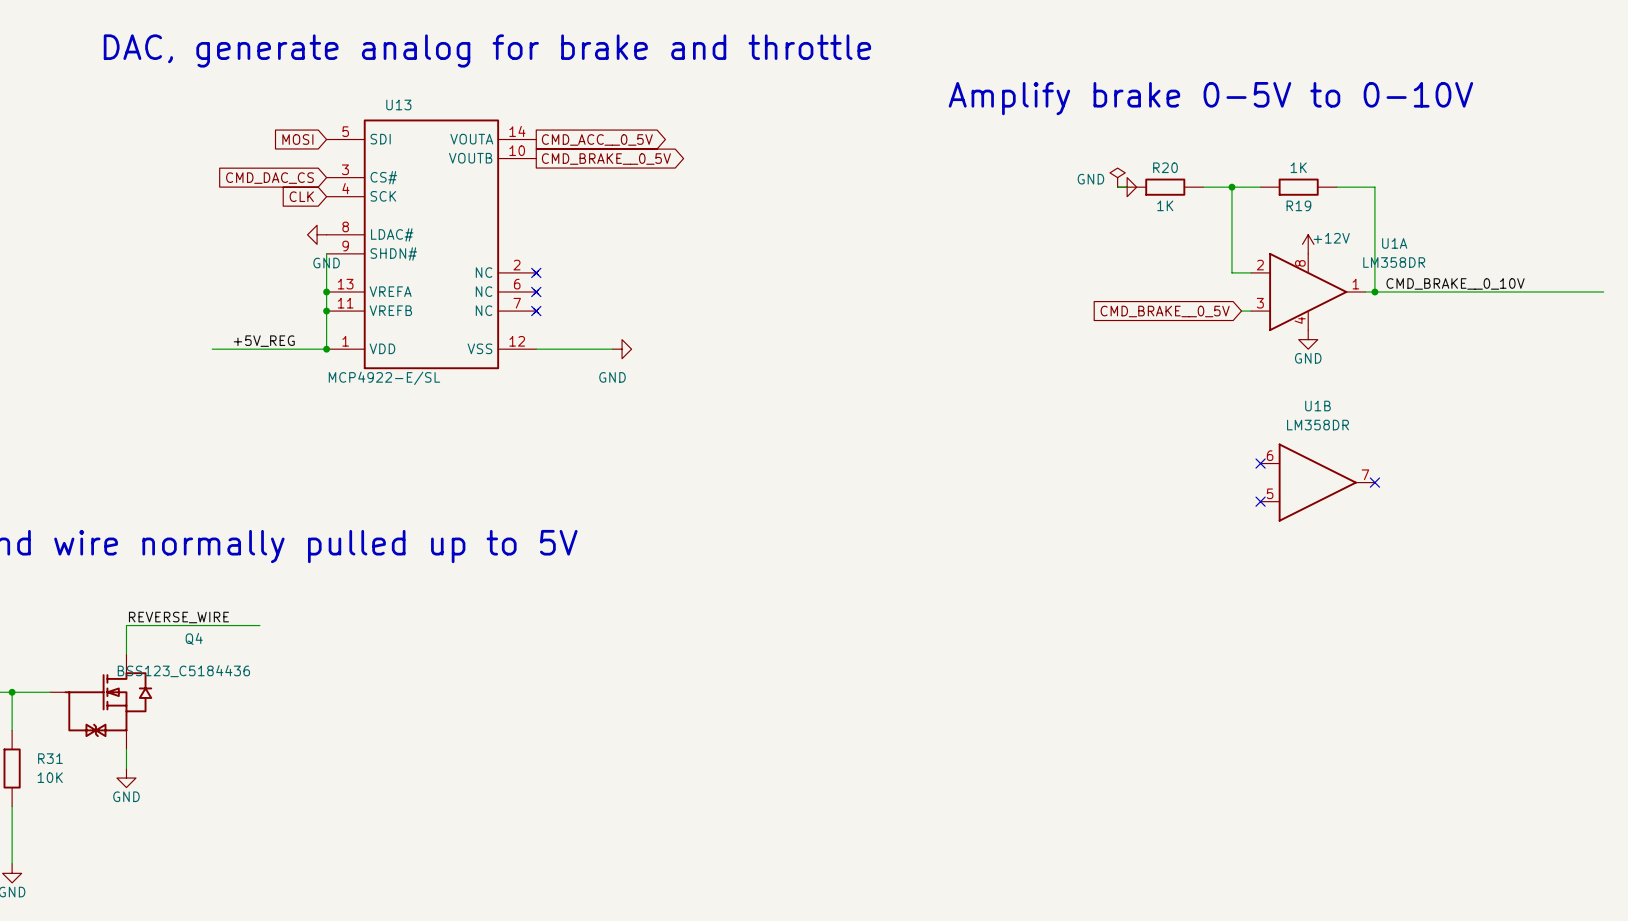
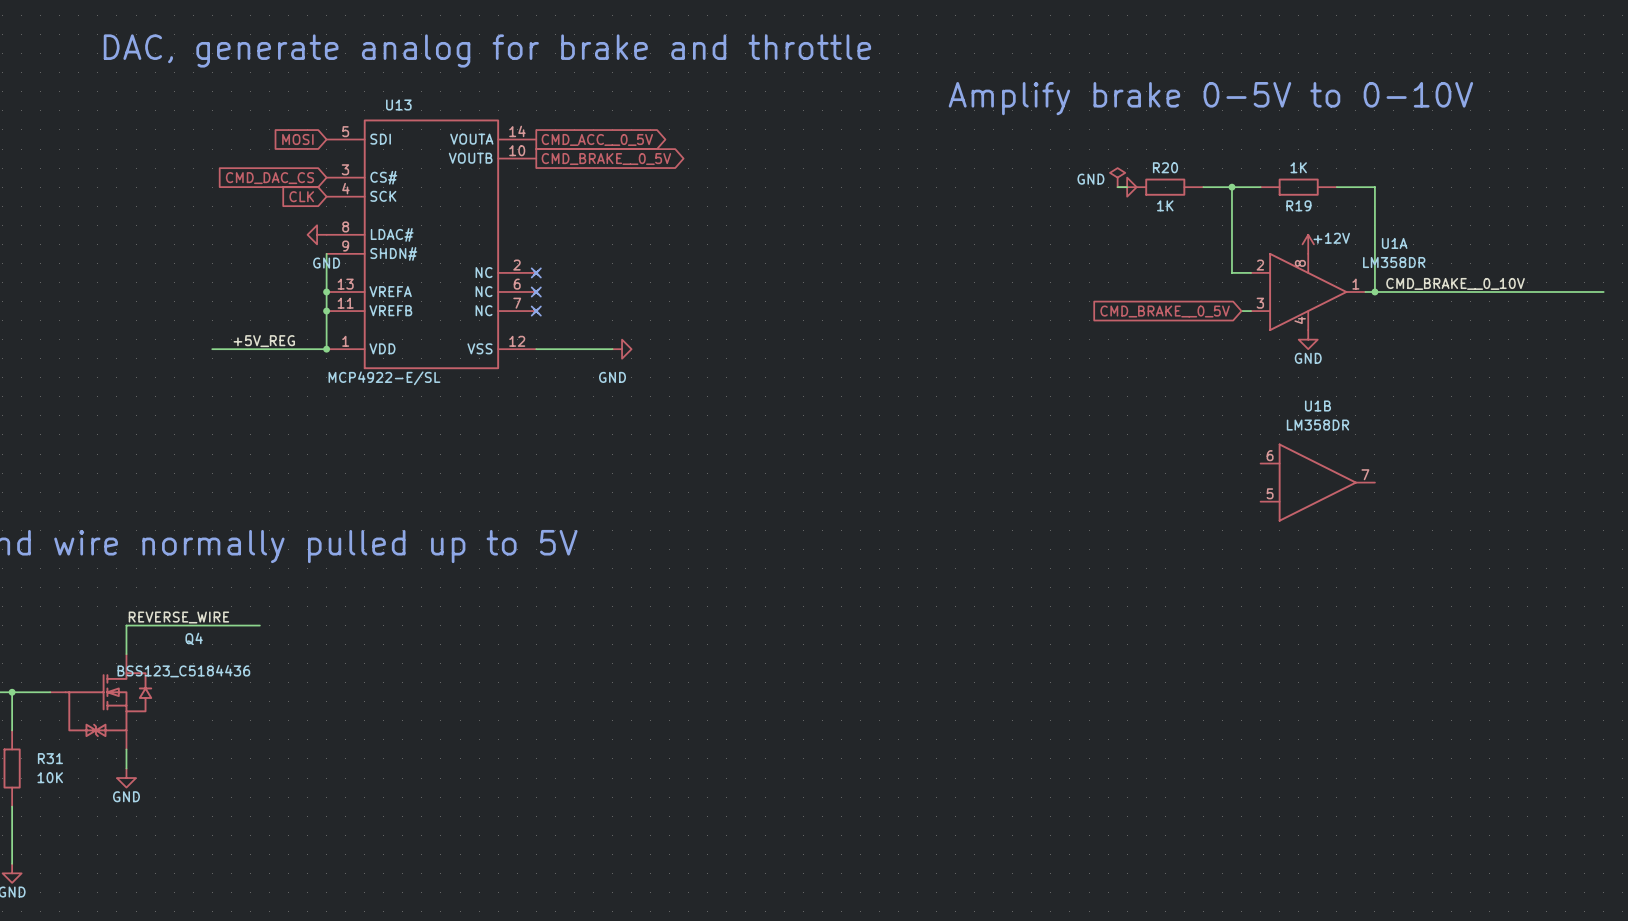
no-connect mark: (1260, 463) -> none
no-connect mark: (1374, 482) -> none
no-connect mark: (1260, 501) -> none

